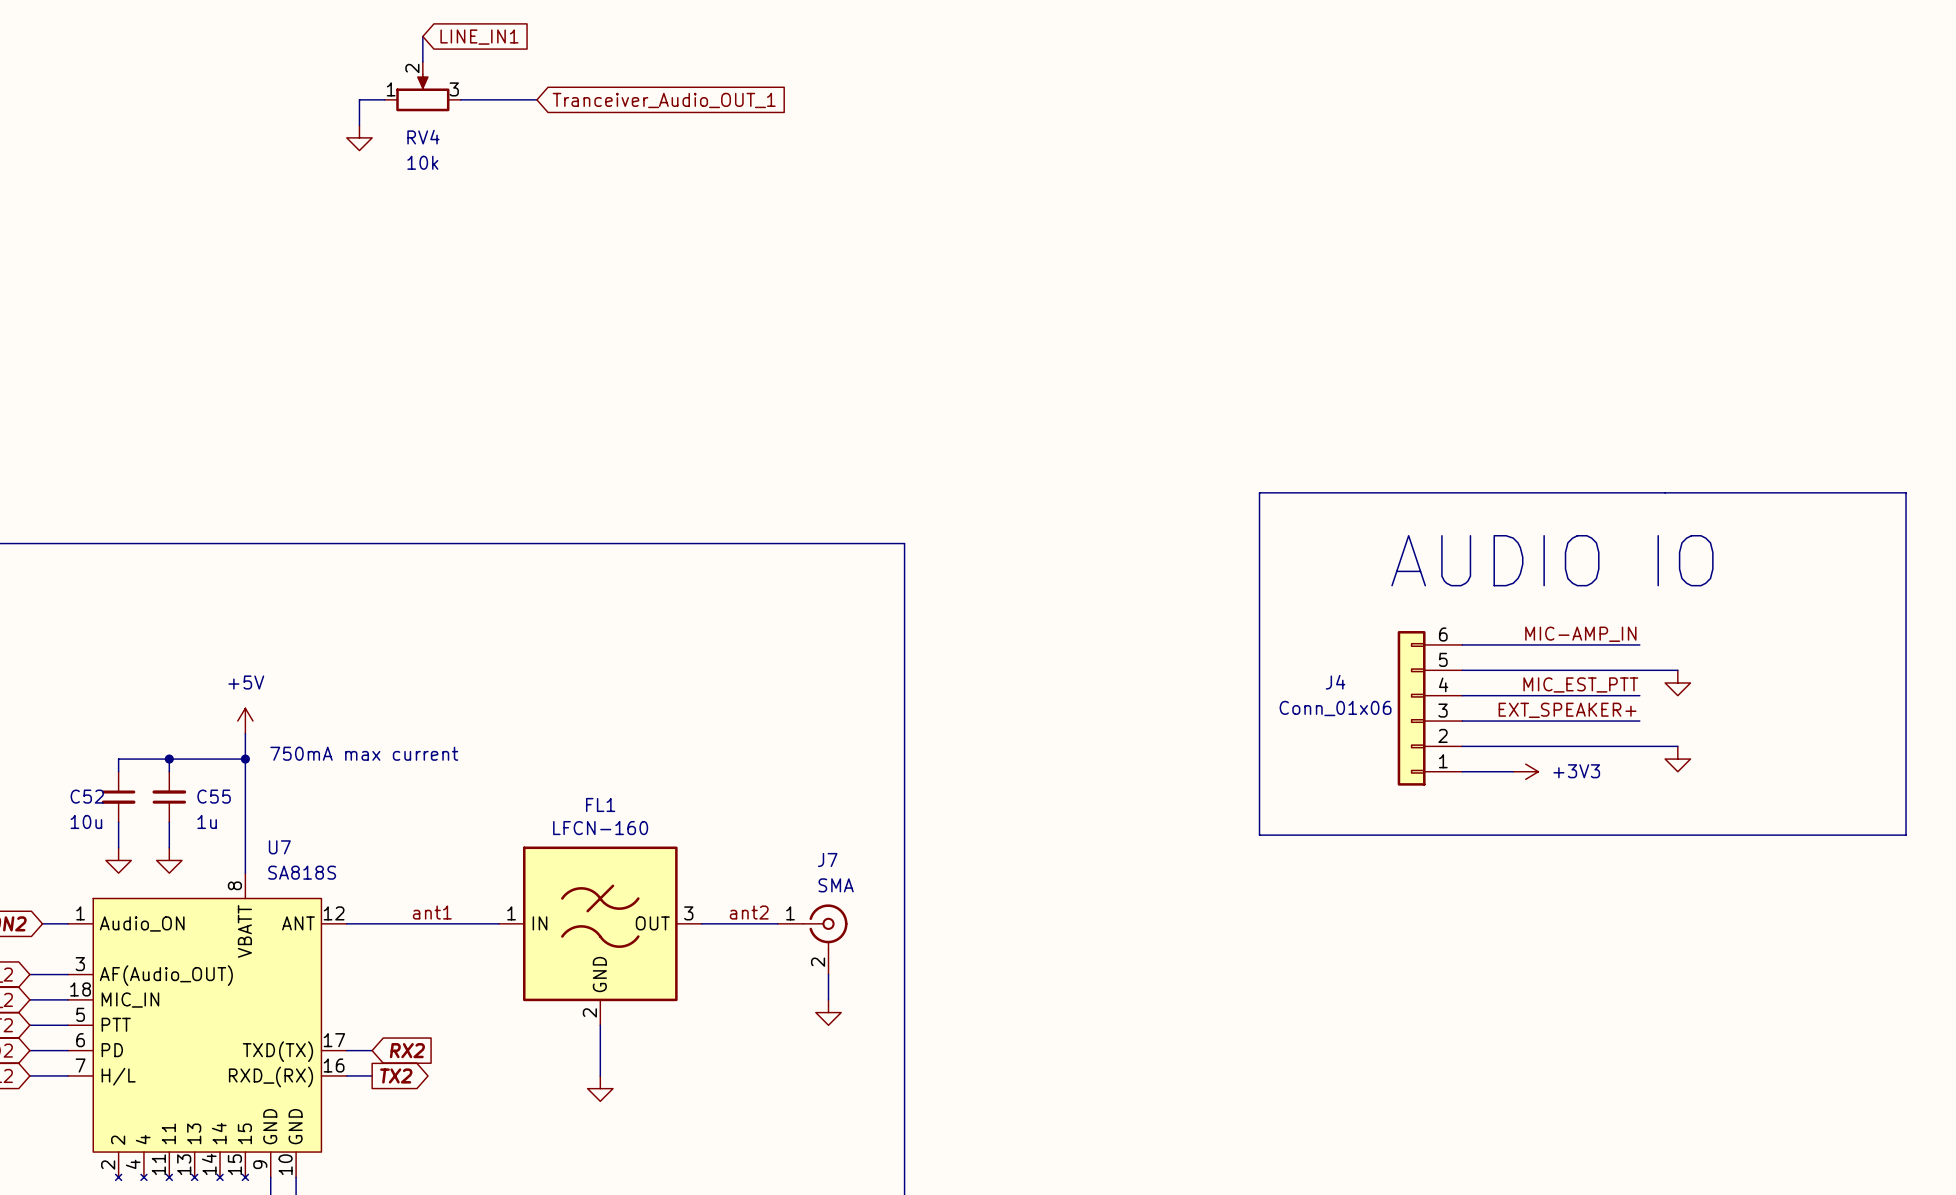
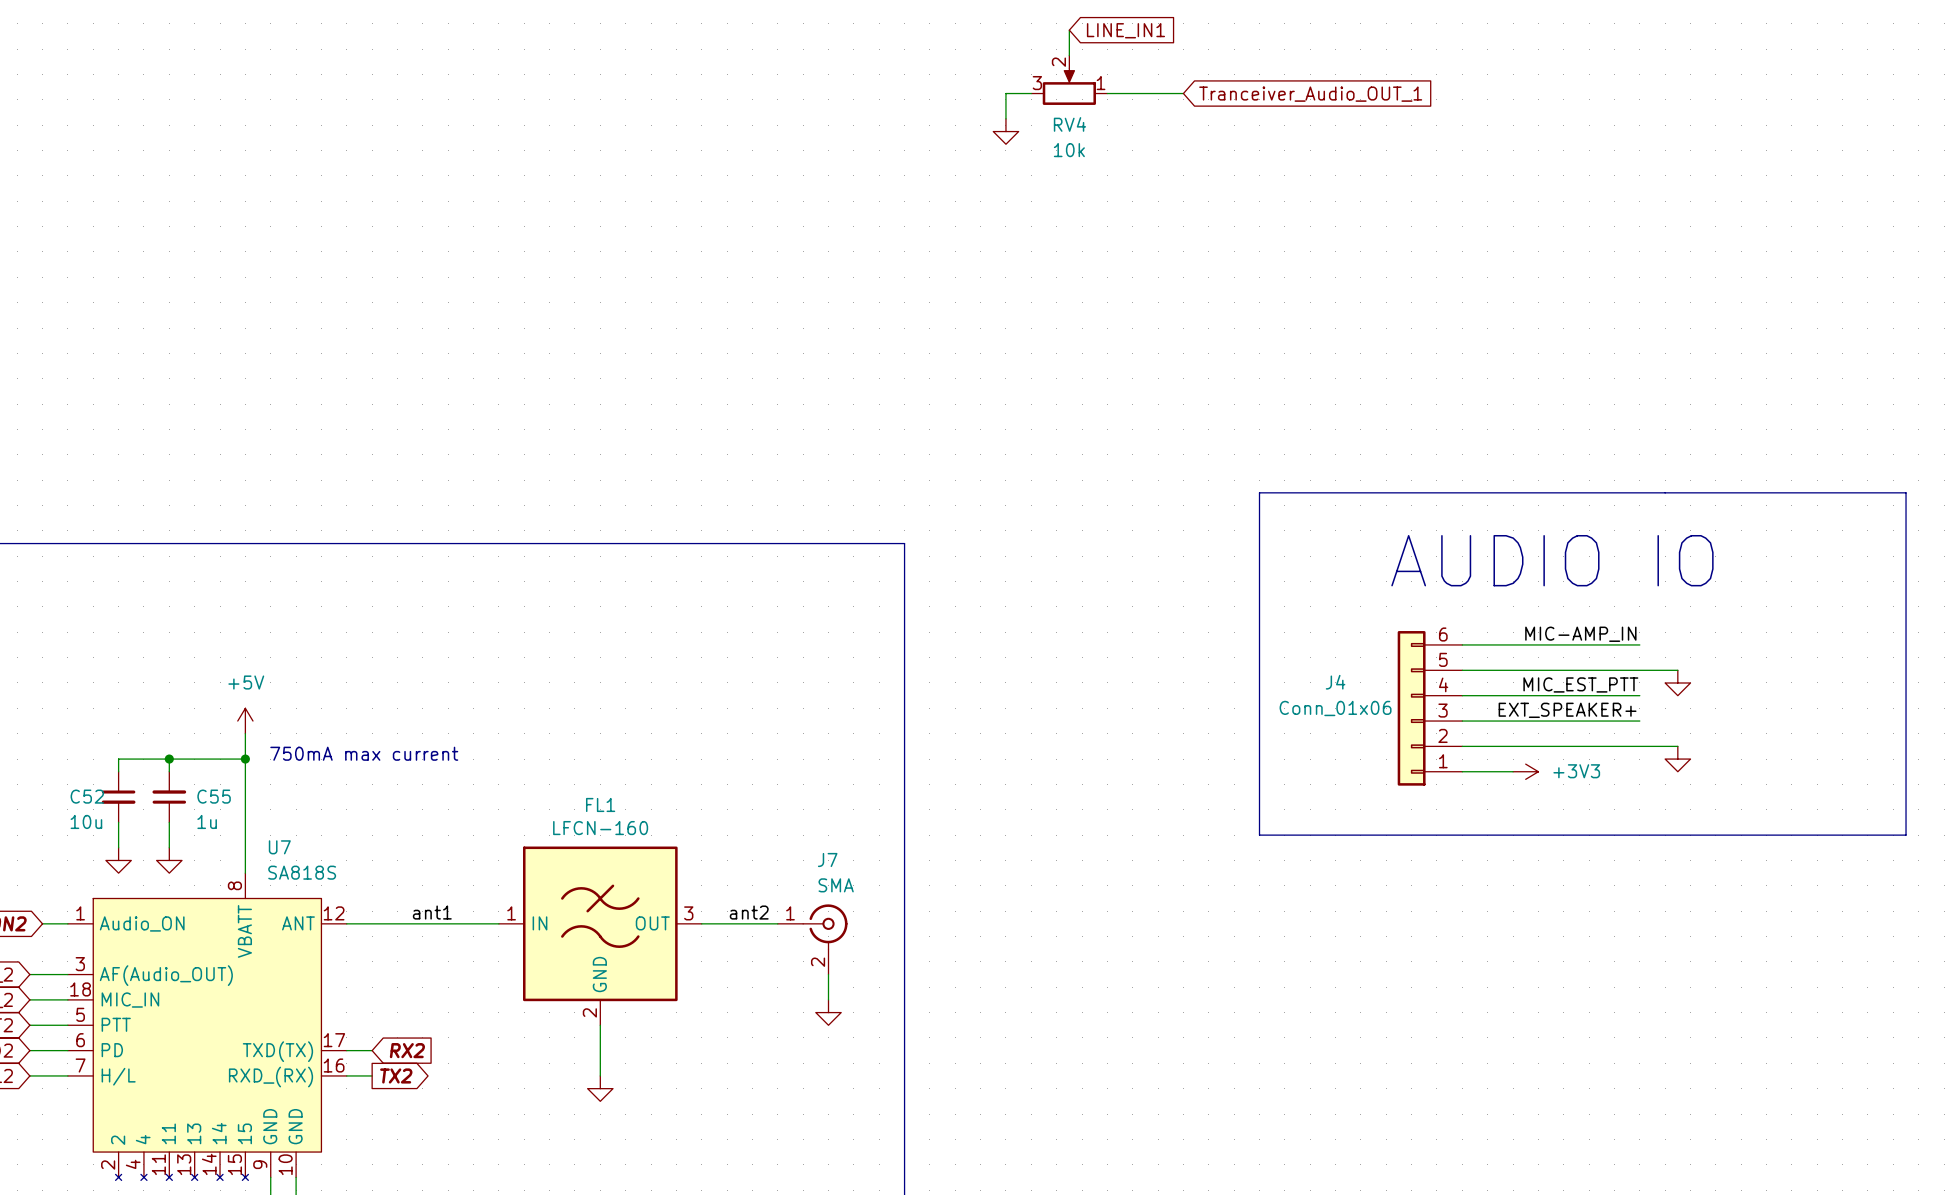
wire: none -> (1069, 30) (1069, 55)
global label: none -> LINE_IN1 (1125, 30)
wire: (422, 36) (422, 61) -> none
global label: LINE_IN1 (479, 37) -> none
RV4 position: (422, 86) -> (1069, 80)
RV4 flip: as is (422, 92) -> left-right (1069, 86)
wire: none -> (1031, 93) (1005, 93) (1005, 118)
wire: none -> (1107, 93) (1183, 93)
global label: none -> Tranceiver_Audio_OUT_1 (1310, 94)
wire: (384, 99) (359, 99) (359, 125) -> none
wire: (460, 99) (536, 99) -> none
global label: Tranceiver_Audio_OUT_1 (664, 100) -> none
power symbol: none -> (1005, 131)
power symbol: (359, 137) -> none

